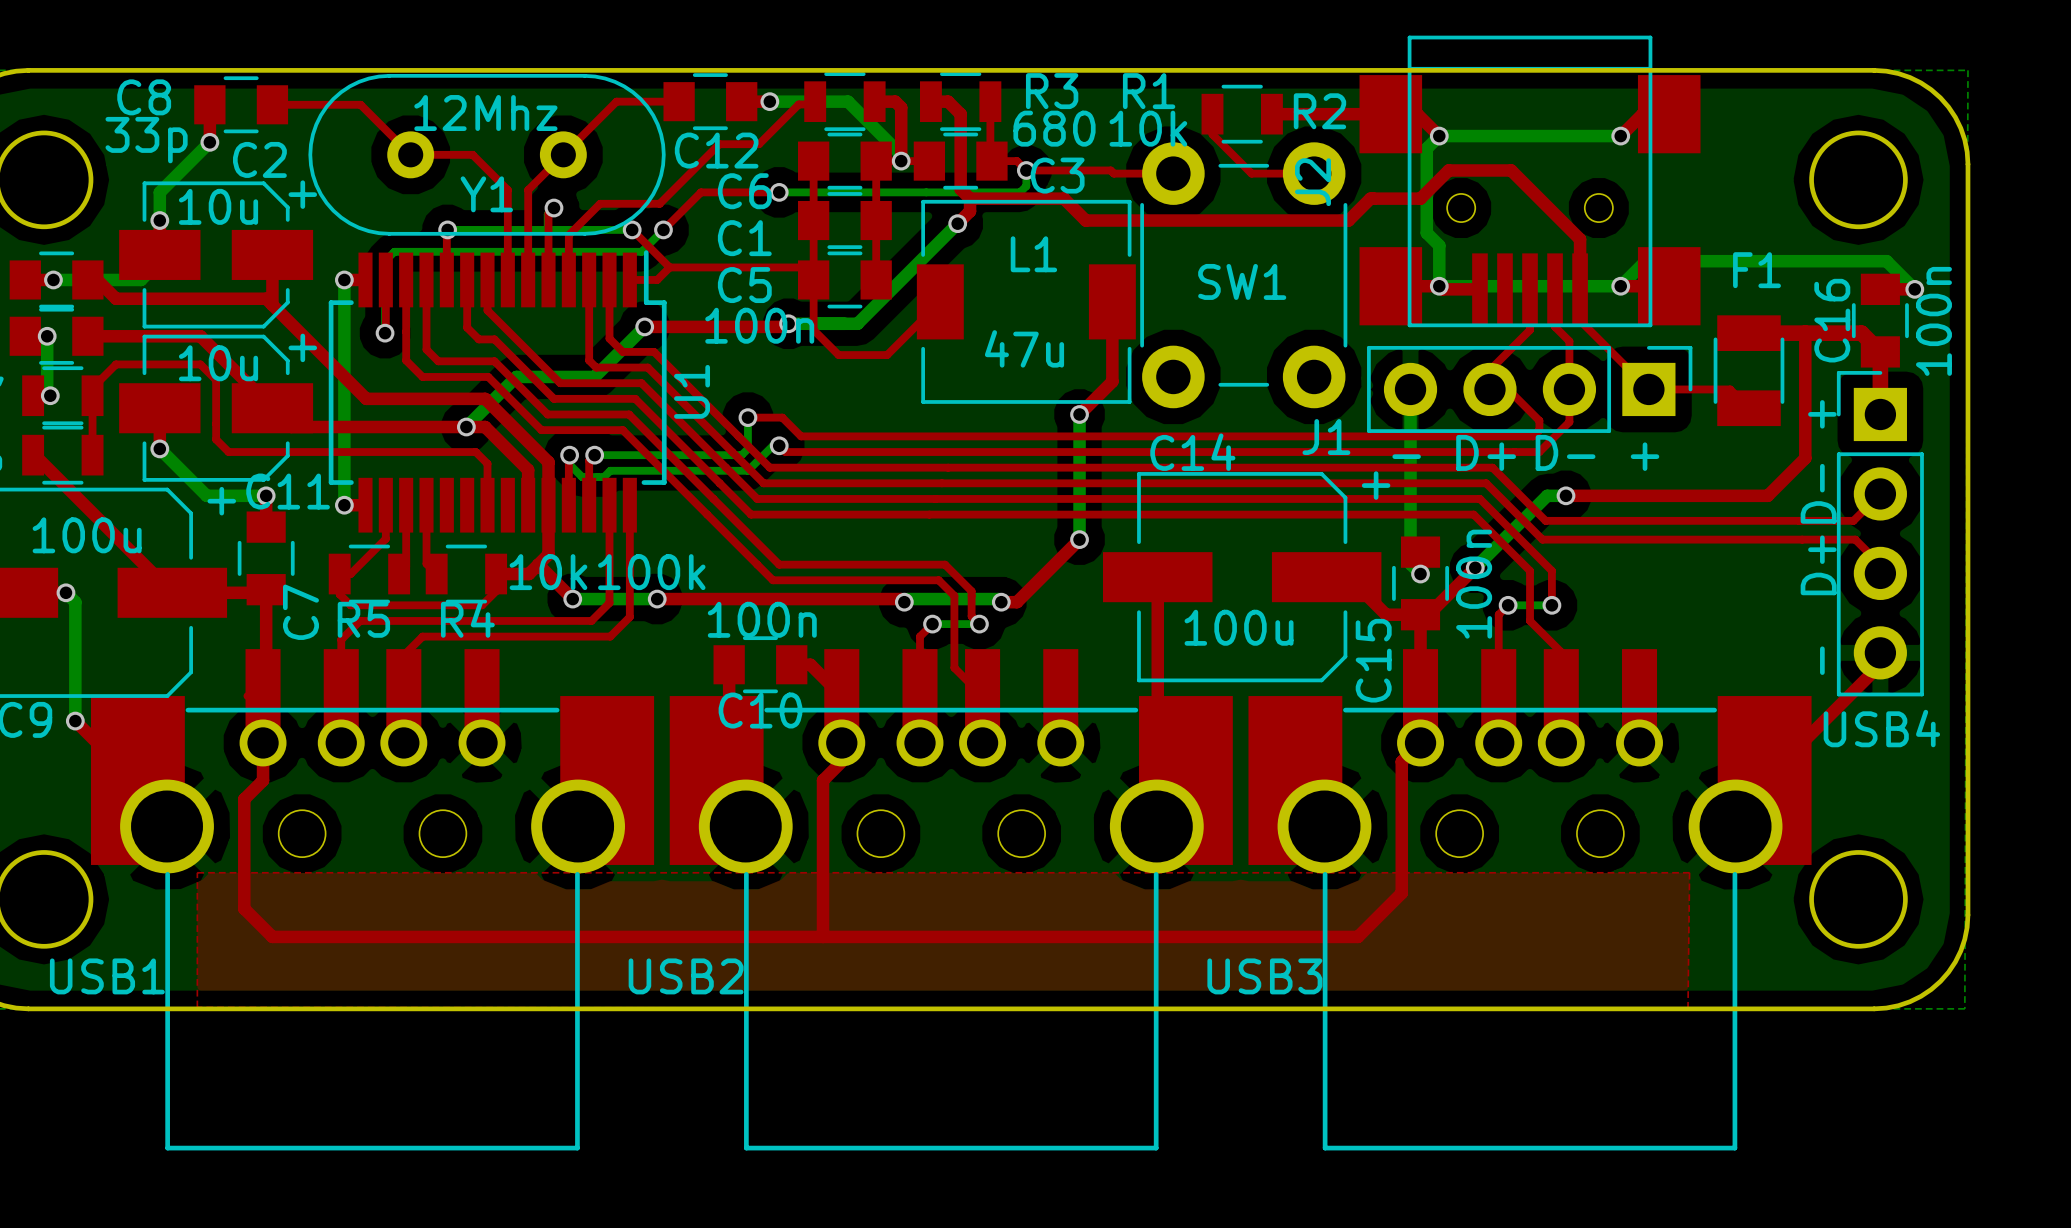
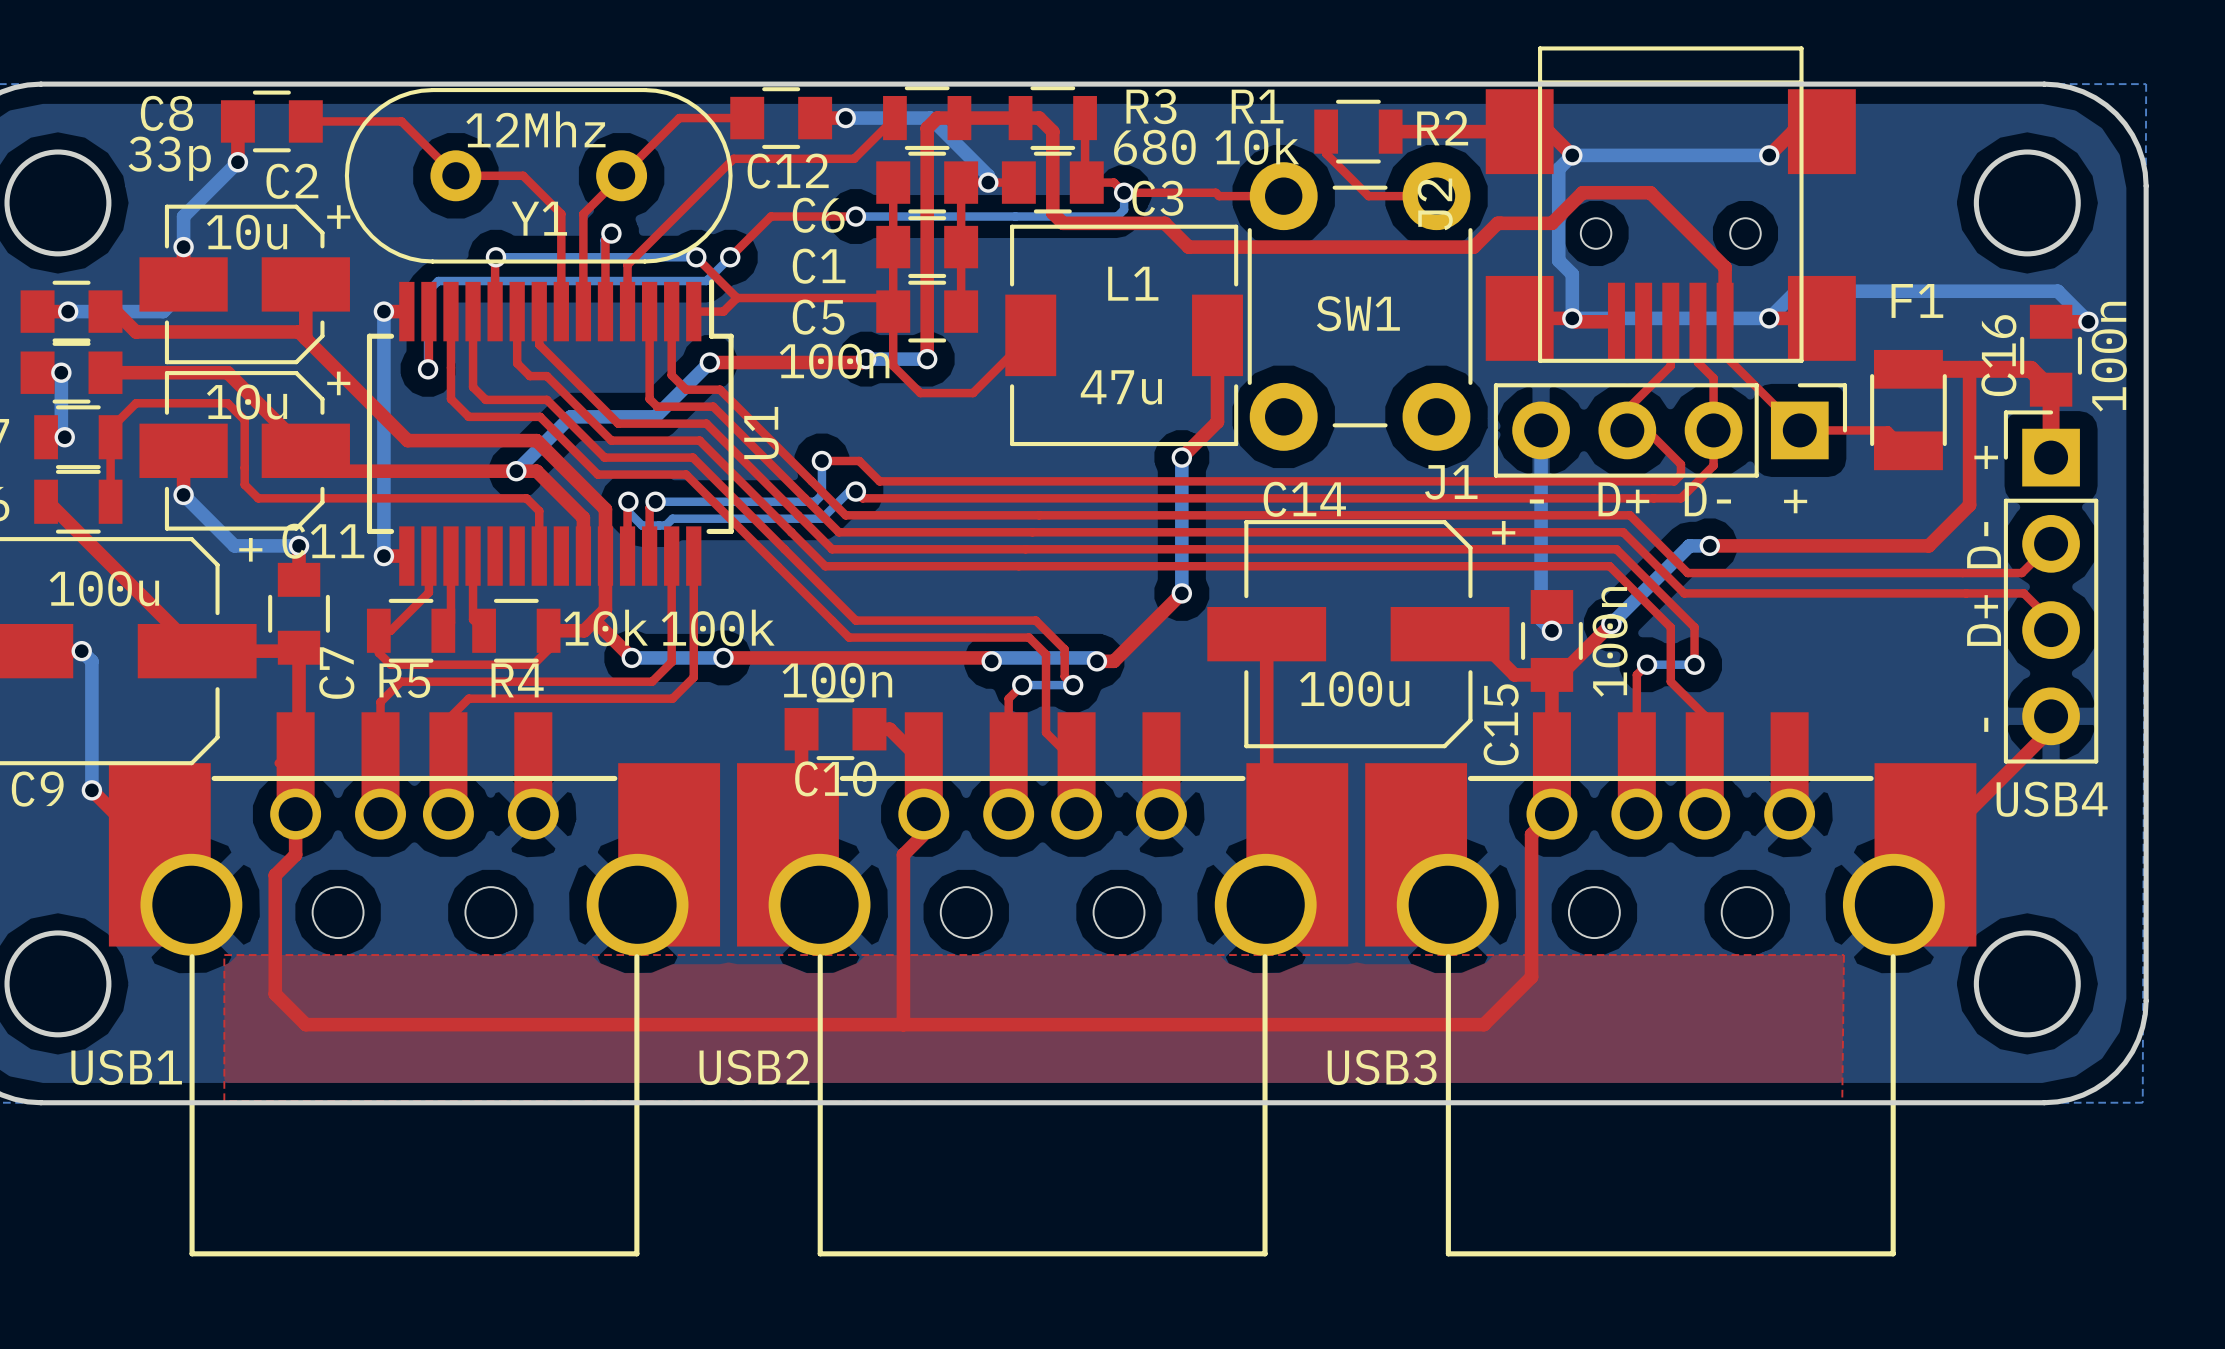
top track: none -> (959, 118) (937, 118) (927, 128) (927, 359)
top track: (895, 101) (901, 107) (901, 161) -> (981, 118) (1020, 118)
top track: (812, 104) (798, 104) (759, 144) (719, 144) (659, 203) (600, 203) (568, 236) -> (891, 121) (854, 158) (733, 158) (627, 264)
top track: (970, 198) (970, 211) (957, 223) -> none
bottom track: (957, 223) (857, 323) (844, 323) -> none
via position: (957, 223) -> (927, 359)

